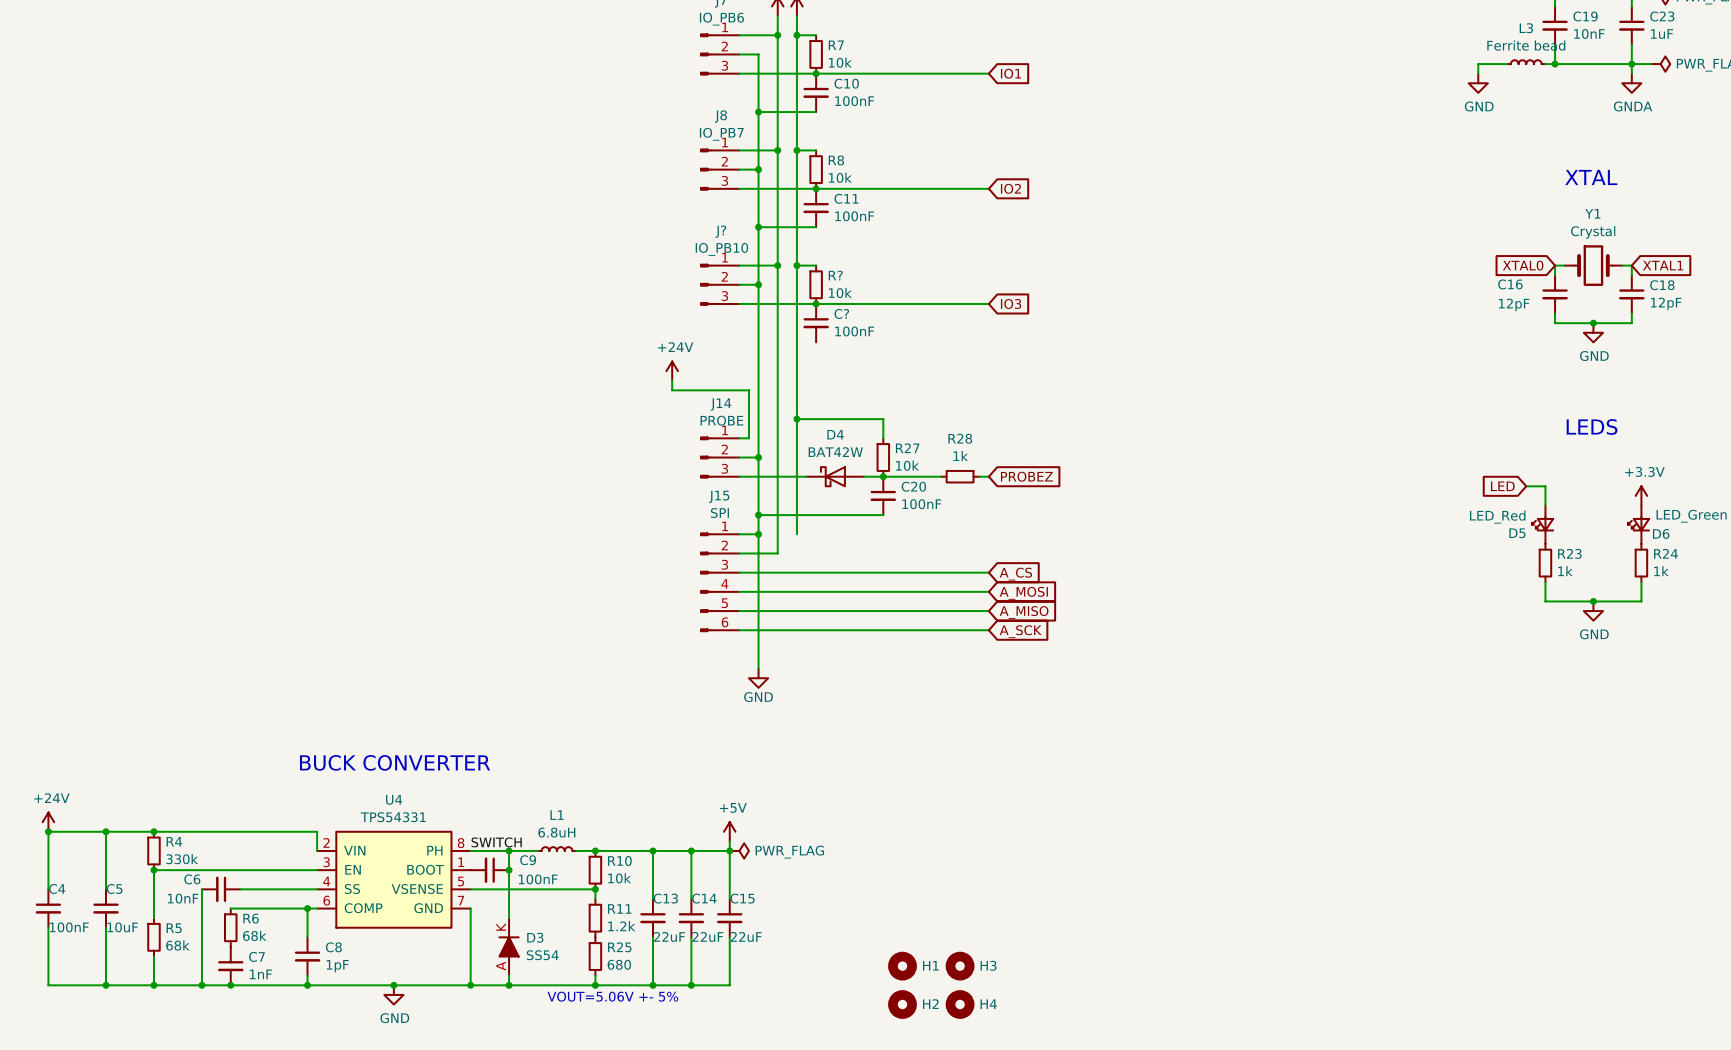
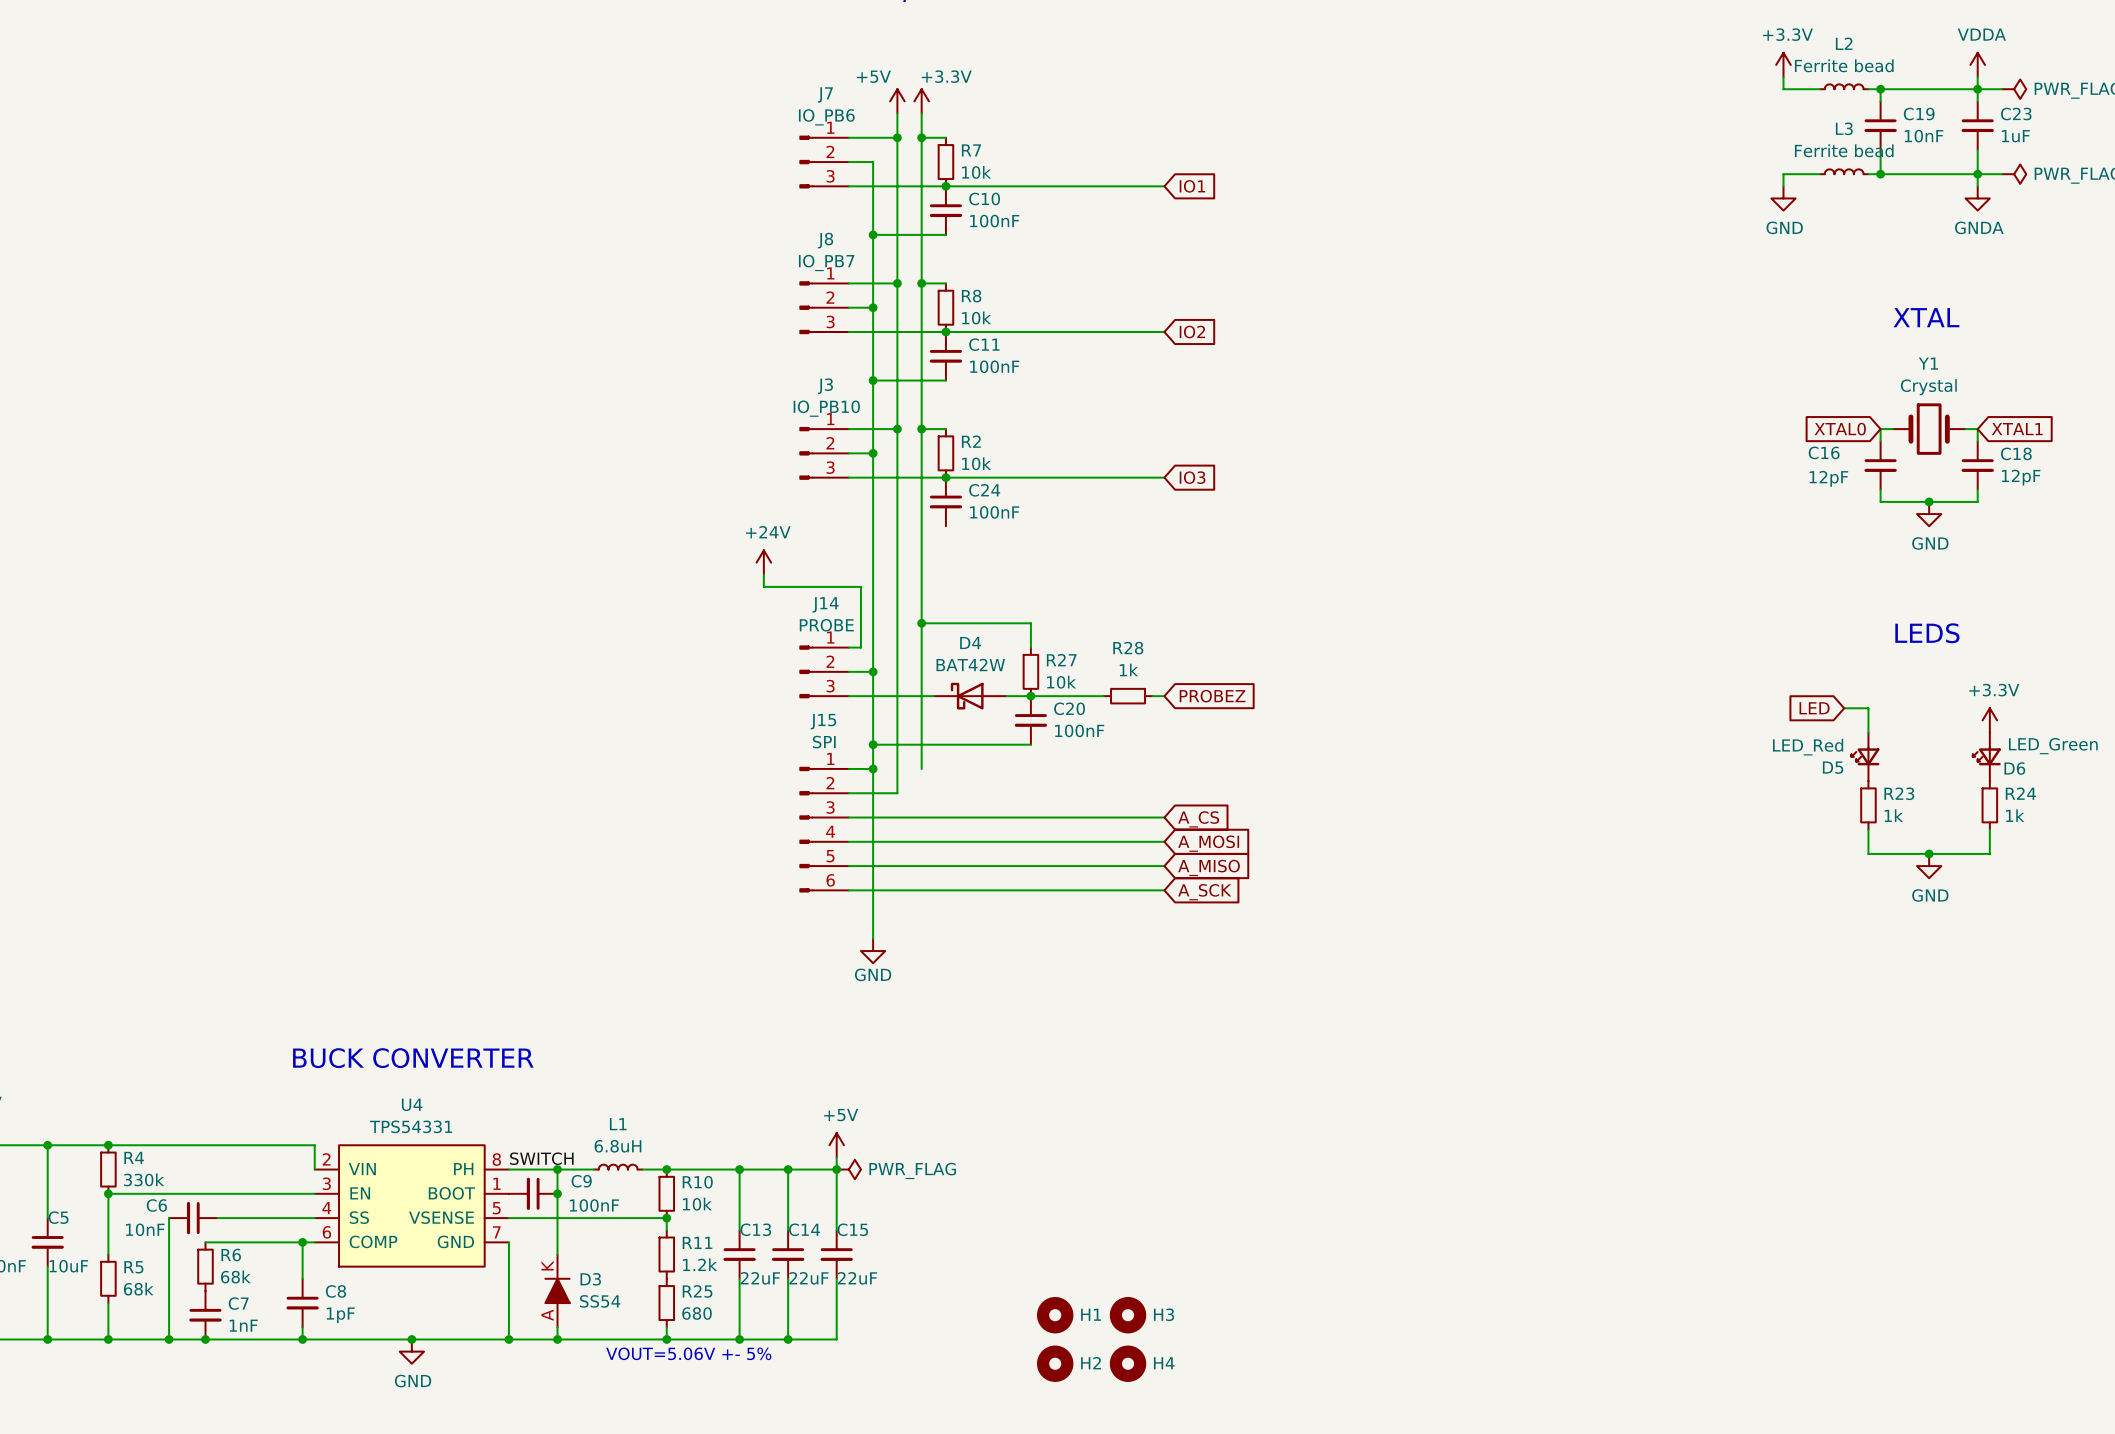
J? name: J? (720, 231) -> J3 (825, 386)
R? name: R? (835, 275) -> R2 (971, 441)
C? name: C? (841, 313) -> C24 (984, 490)

